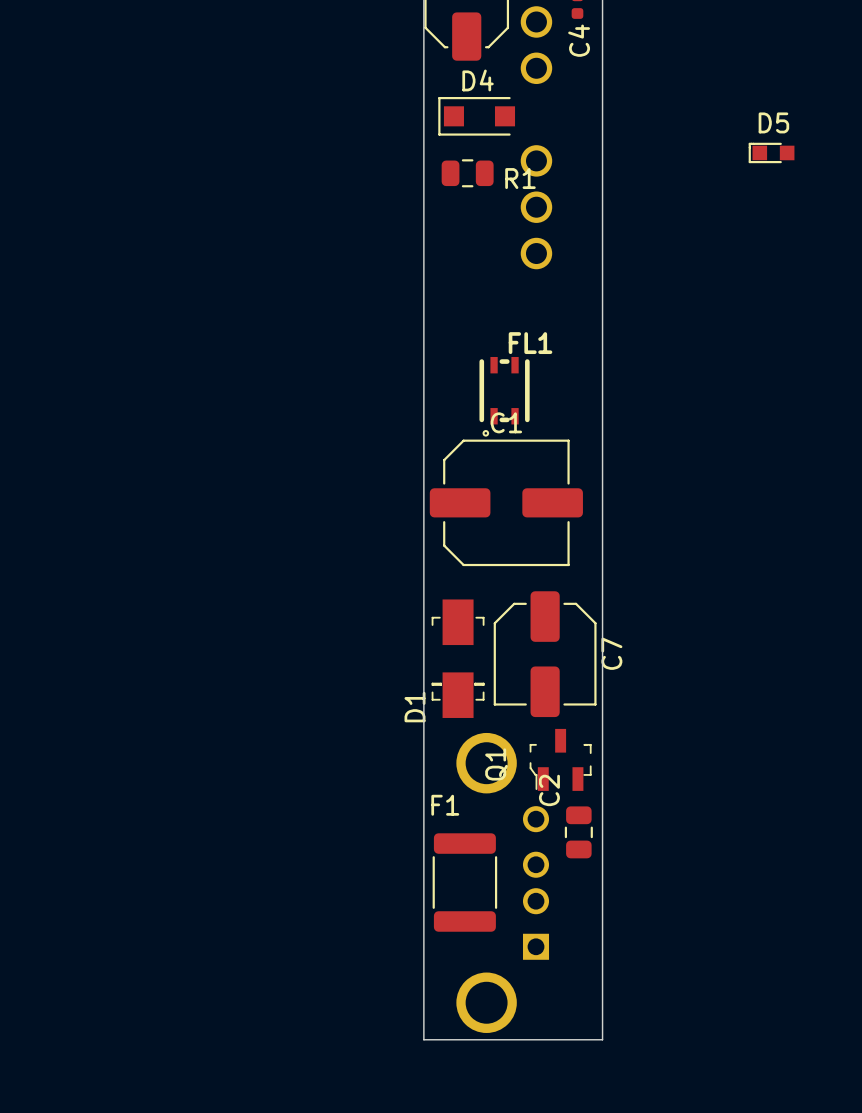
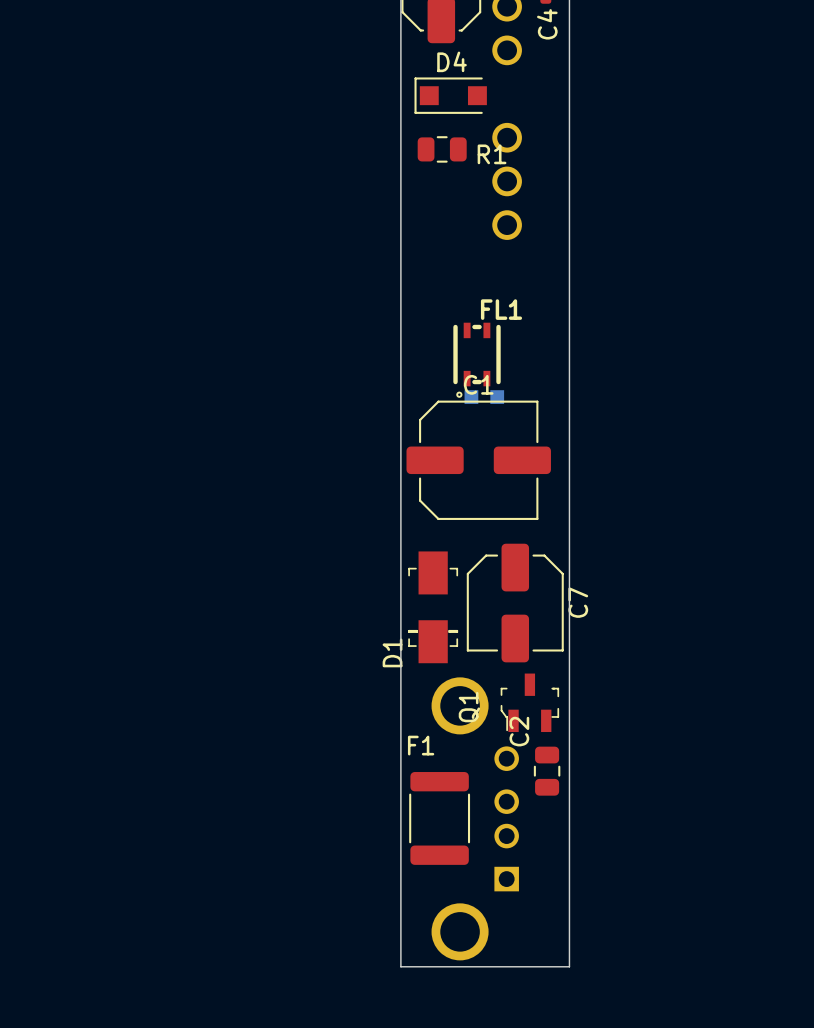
D5 side: top (771, 152) -> bottom (484, 397)

